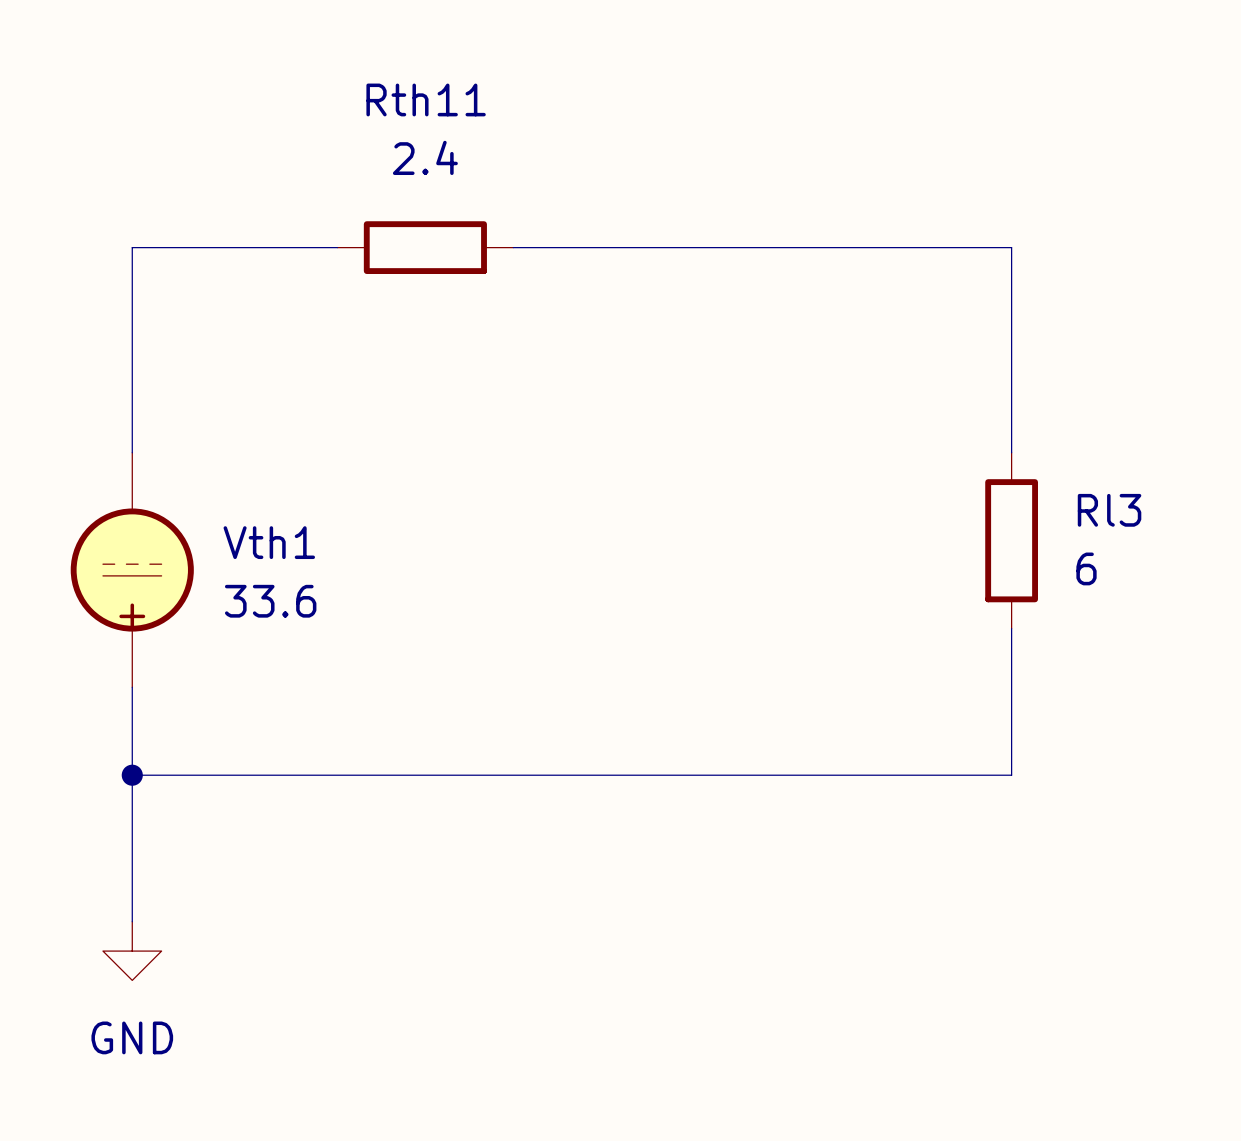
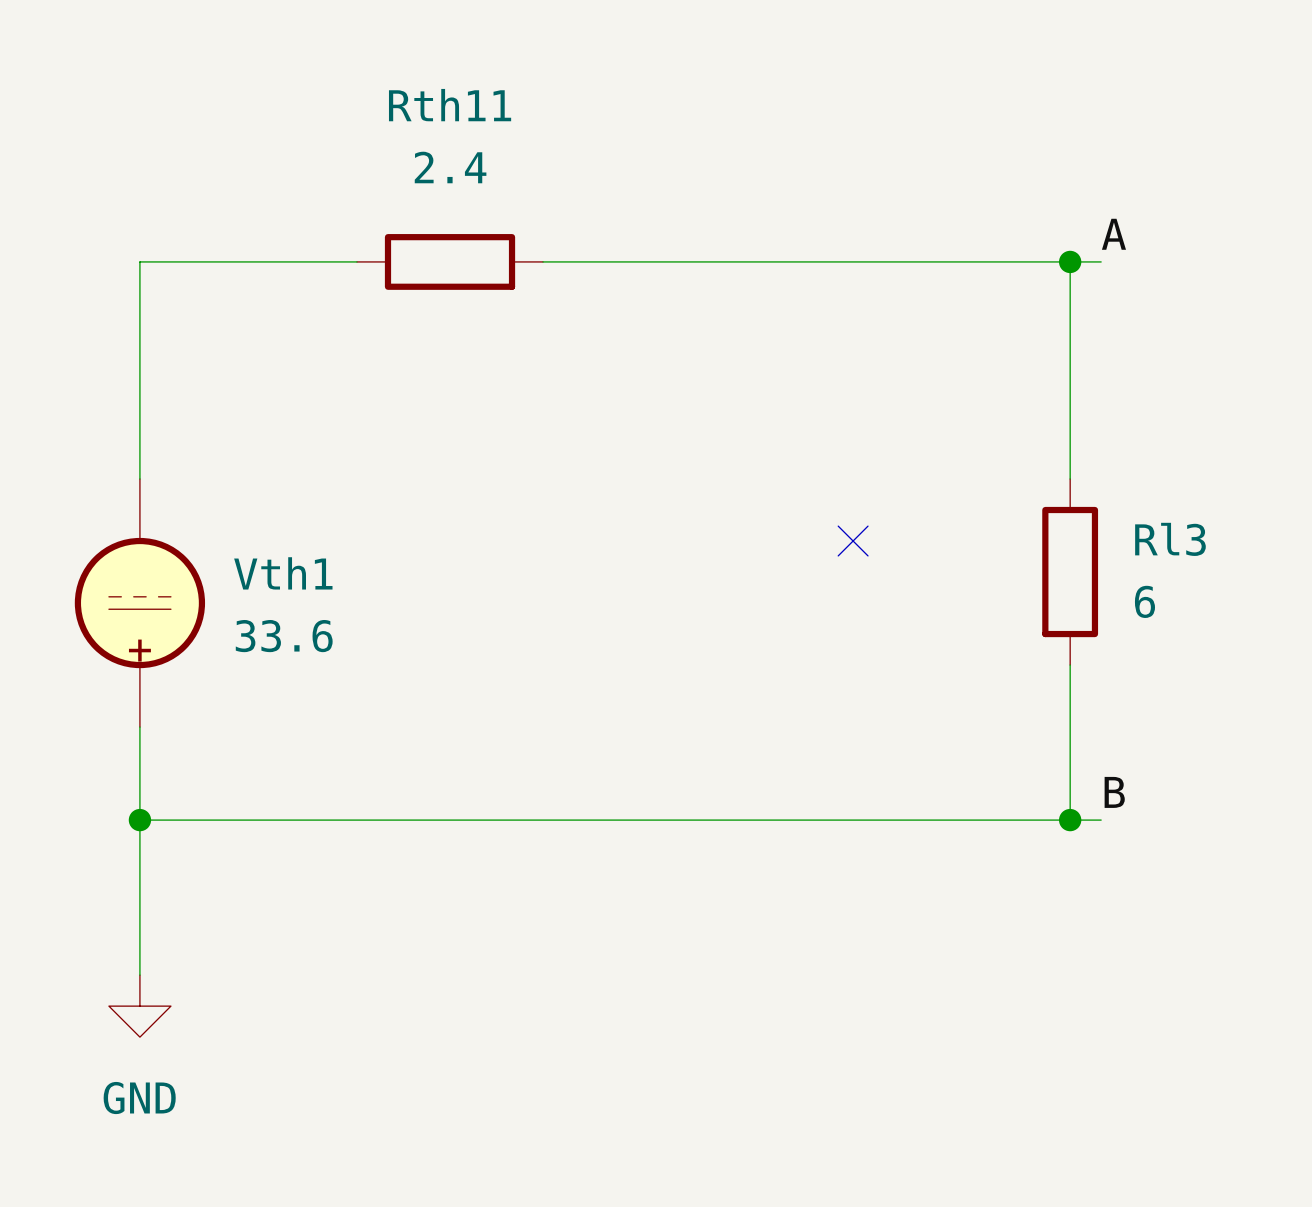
label: none -> A (1113, 234)
wire: none -> (1070, 261) (1101, 261)
junction: none -> (1070, 261)
no-connect mark: none -> (853, 541)
label: none -> B (1114, 792)
wire: none -> (1070, 820) (1101, 820)
junction: none -> (1070, 820)

